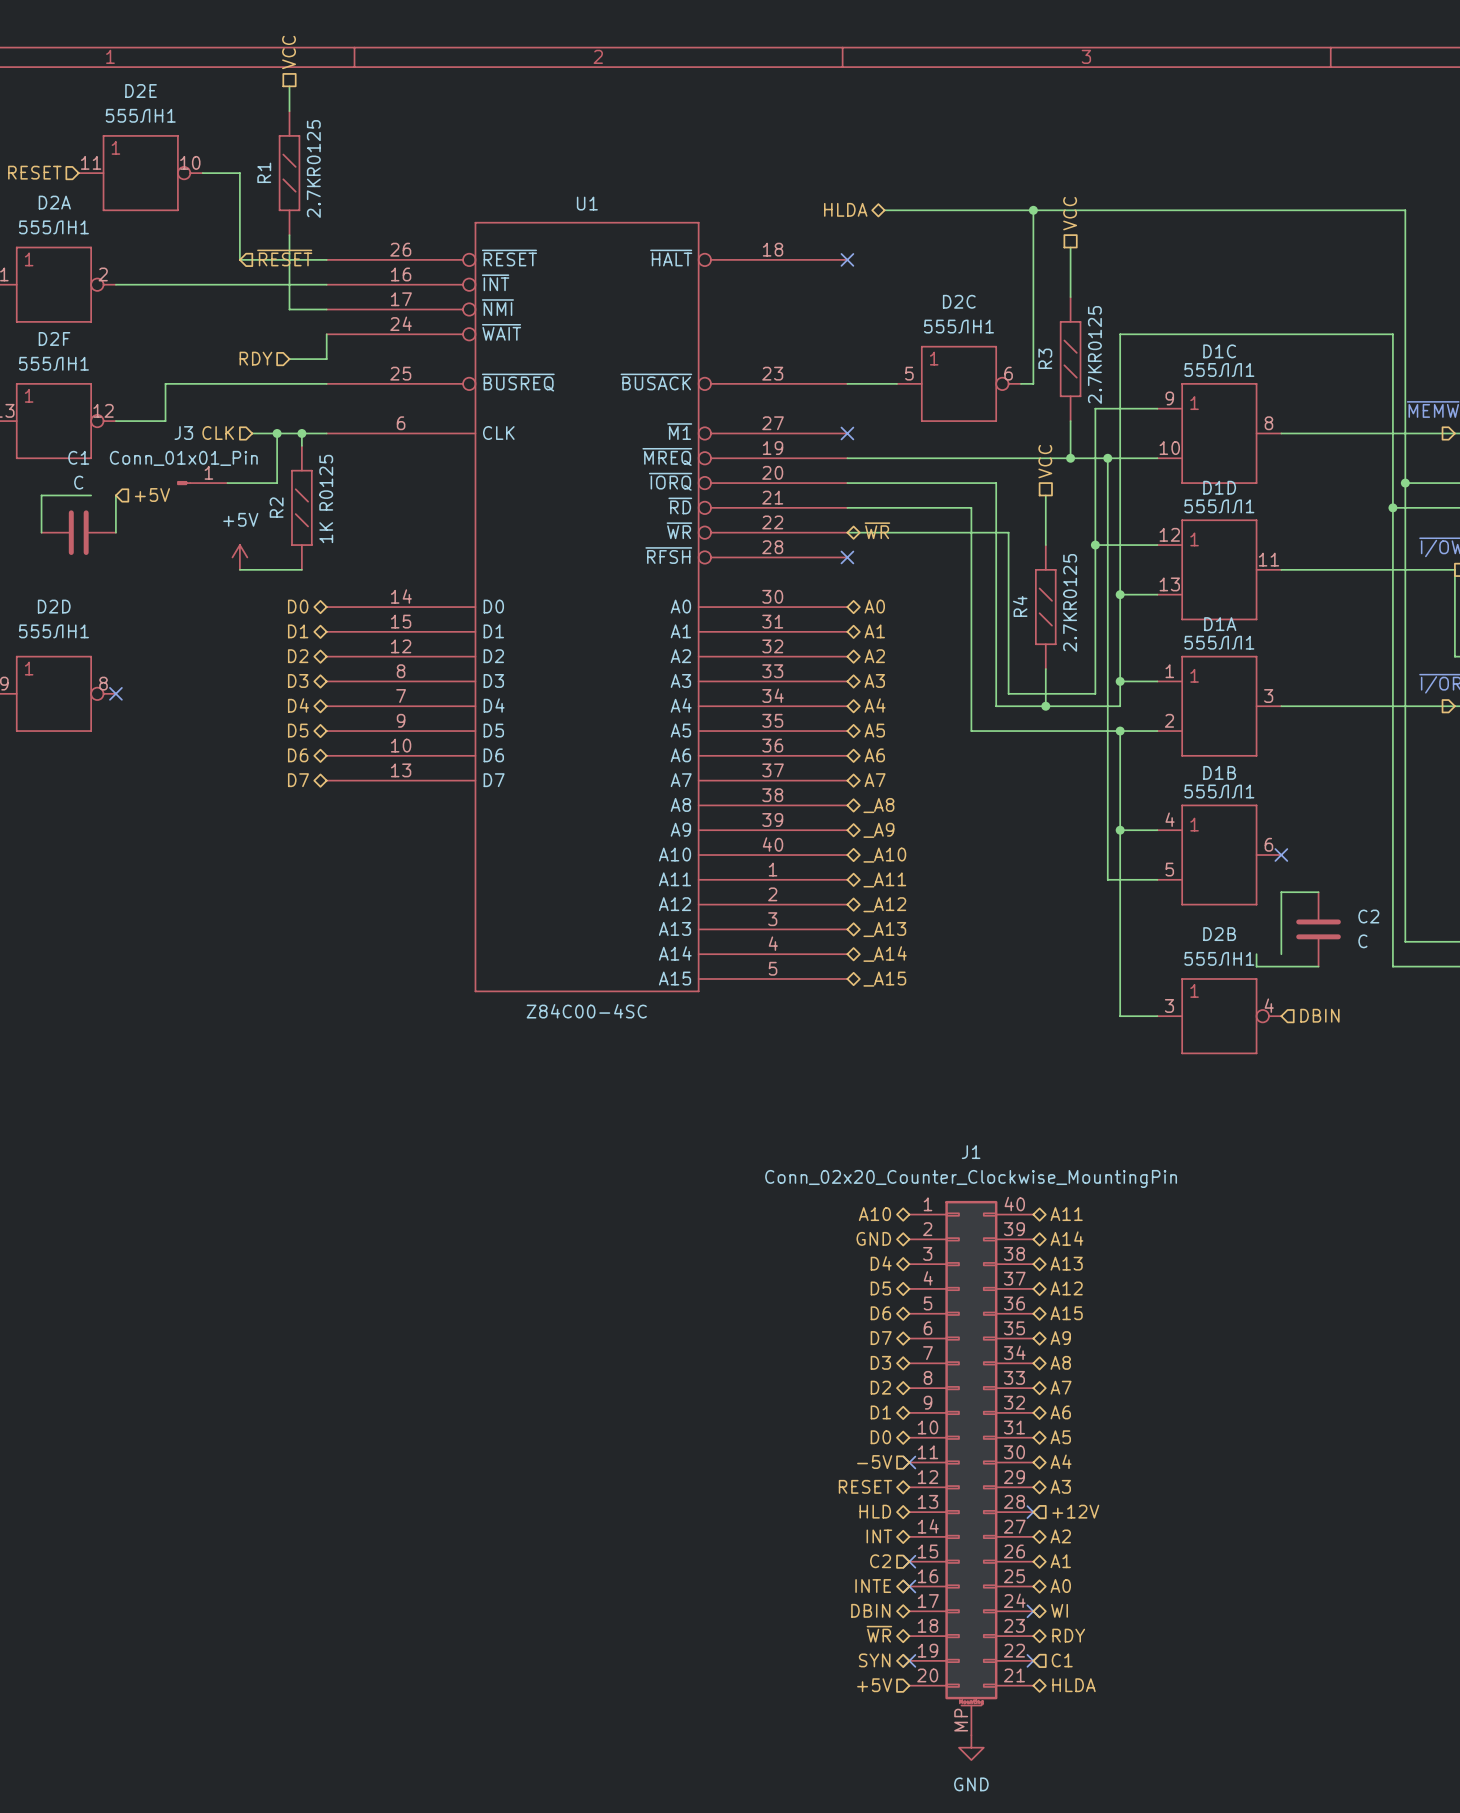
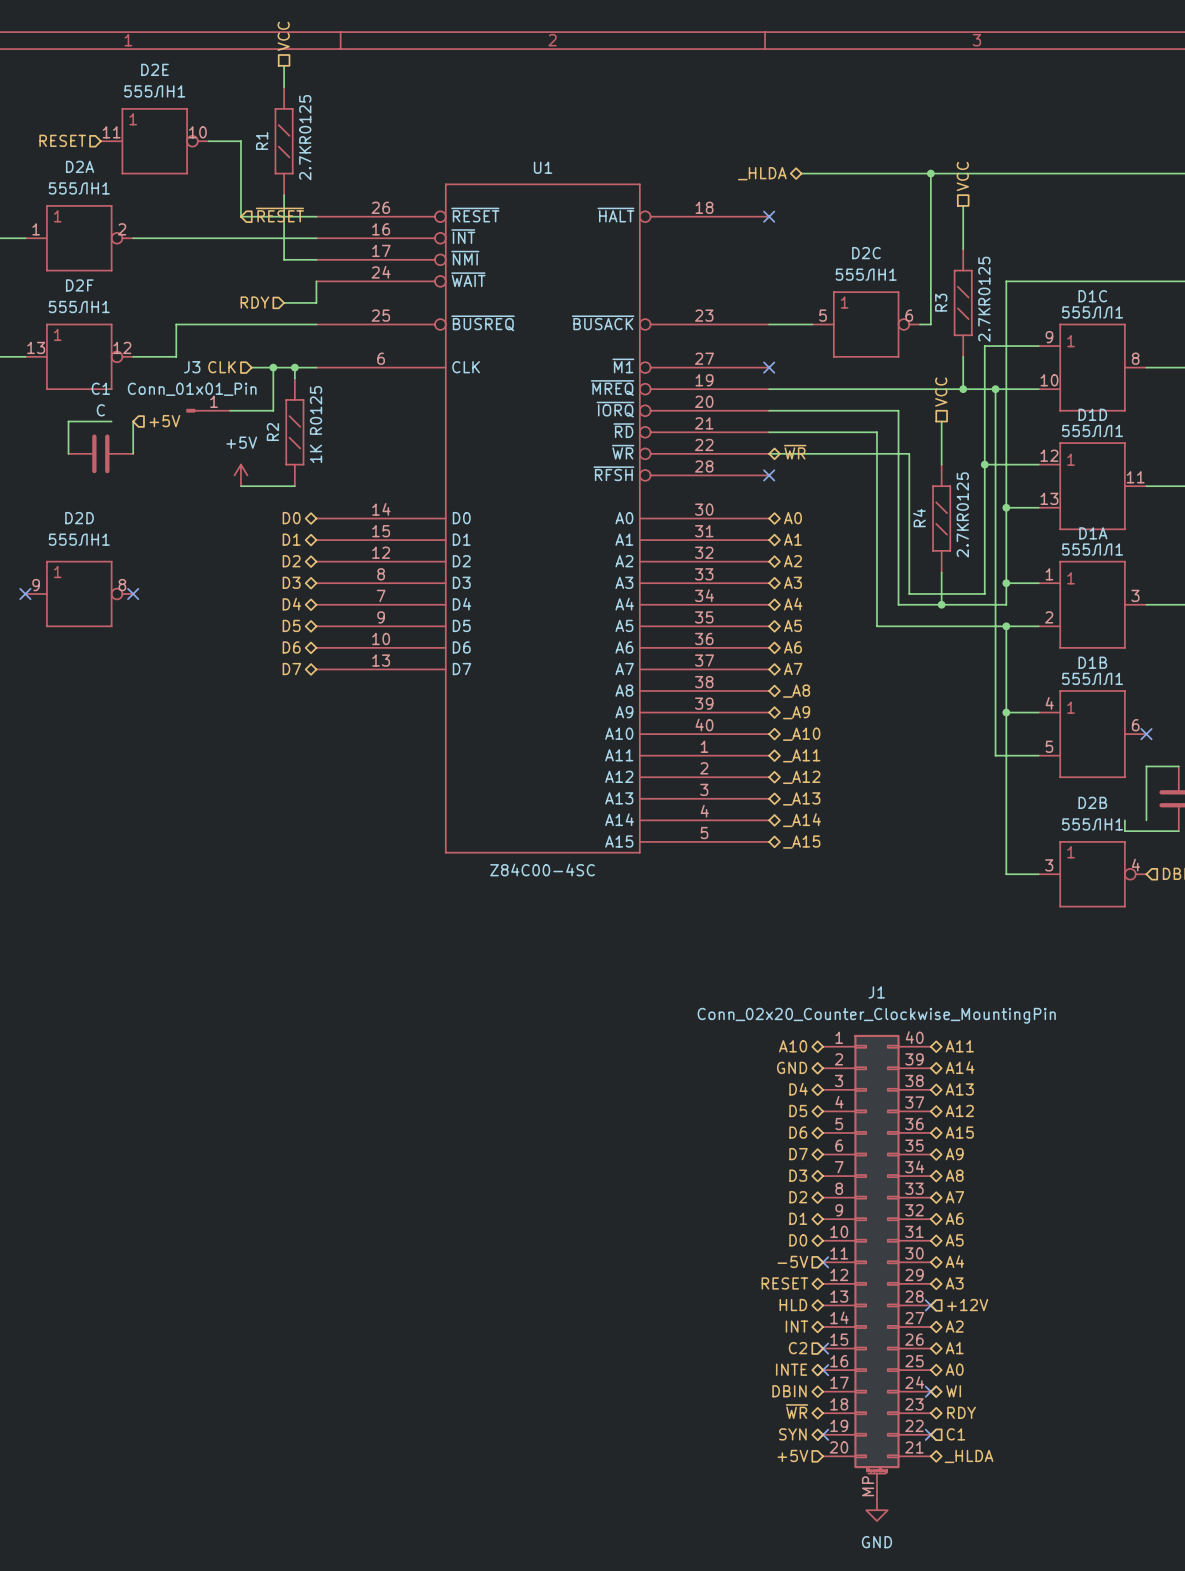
hierarchical label: HLDA (845, 209) -> _HLDA (762, 173)
hierarchical label: HLDA (1074, 1685) -> _HLDA (969, 1456)

